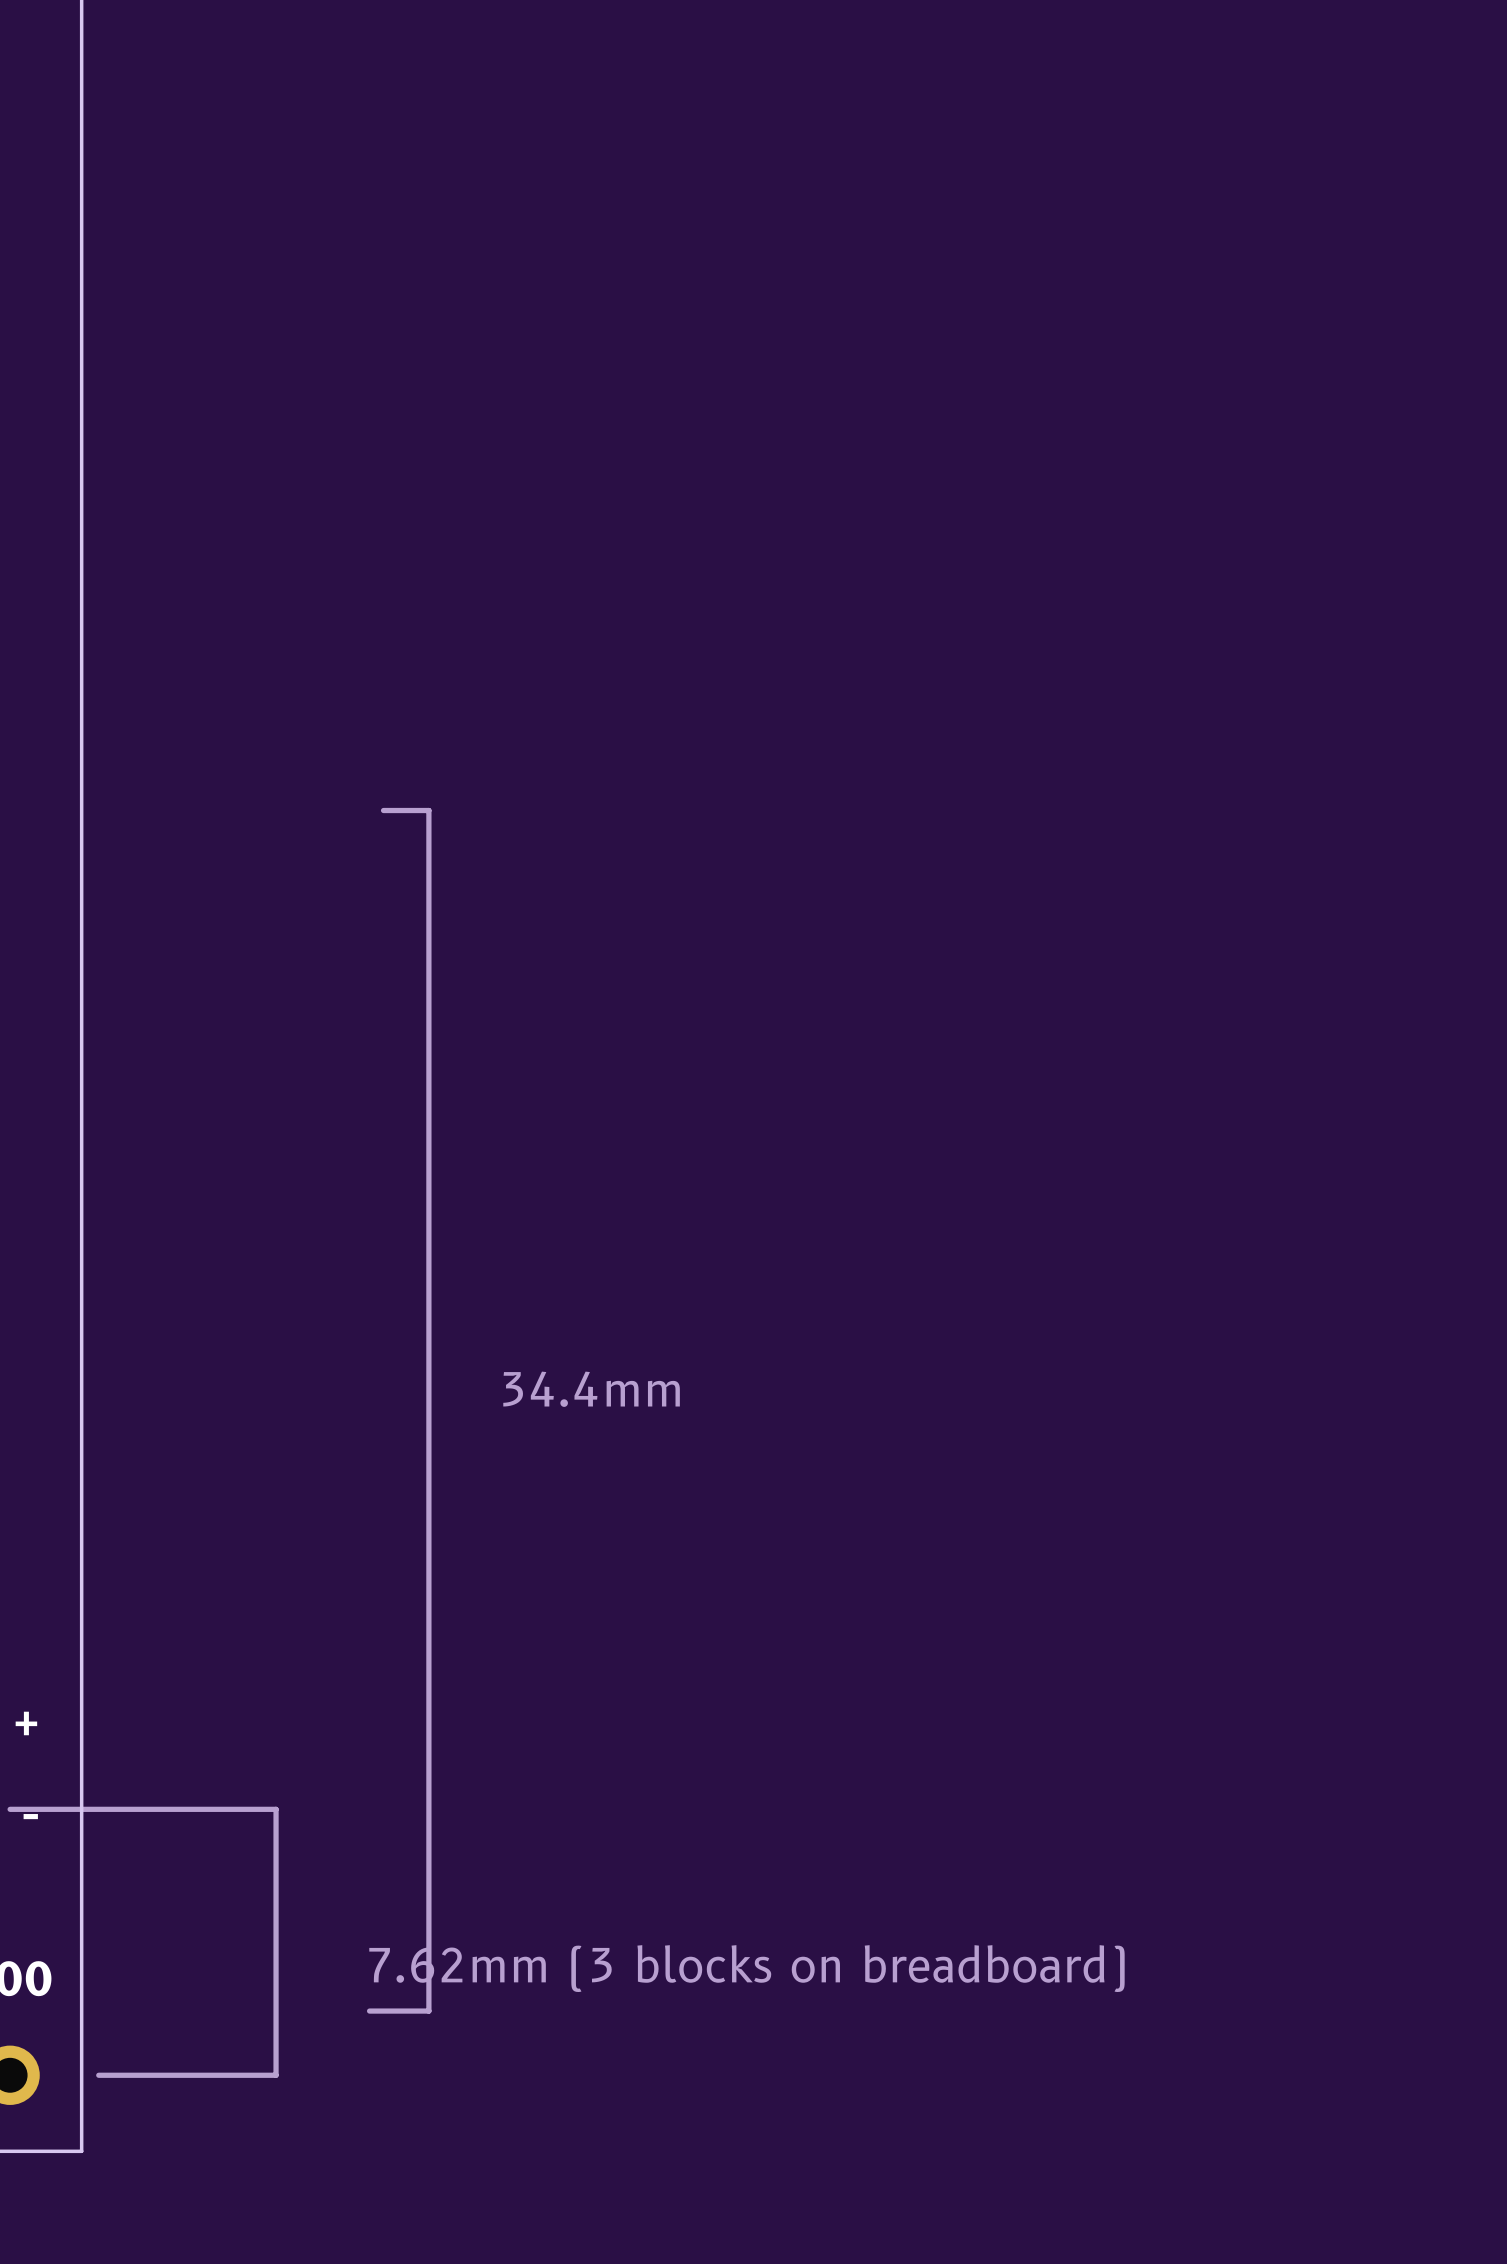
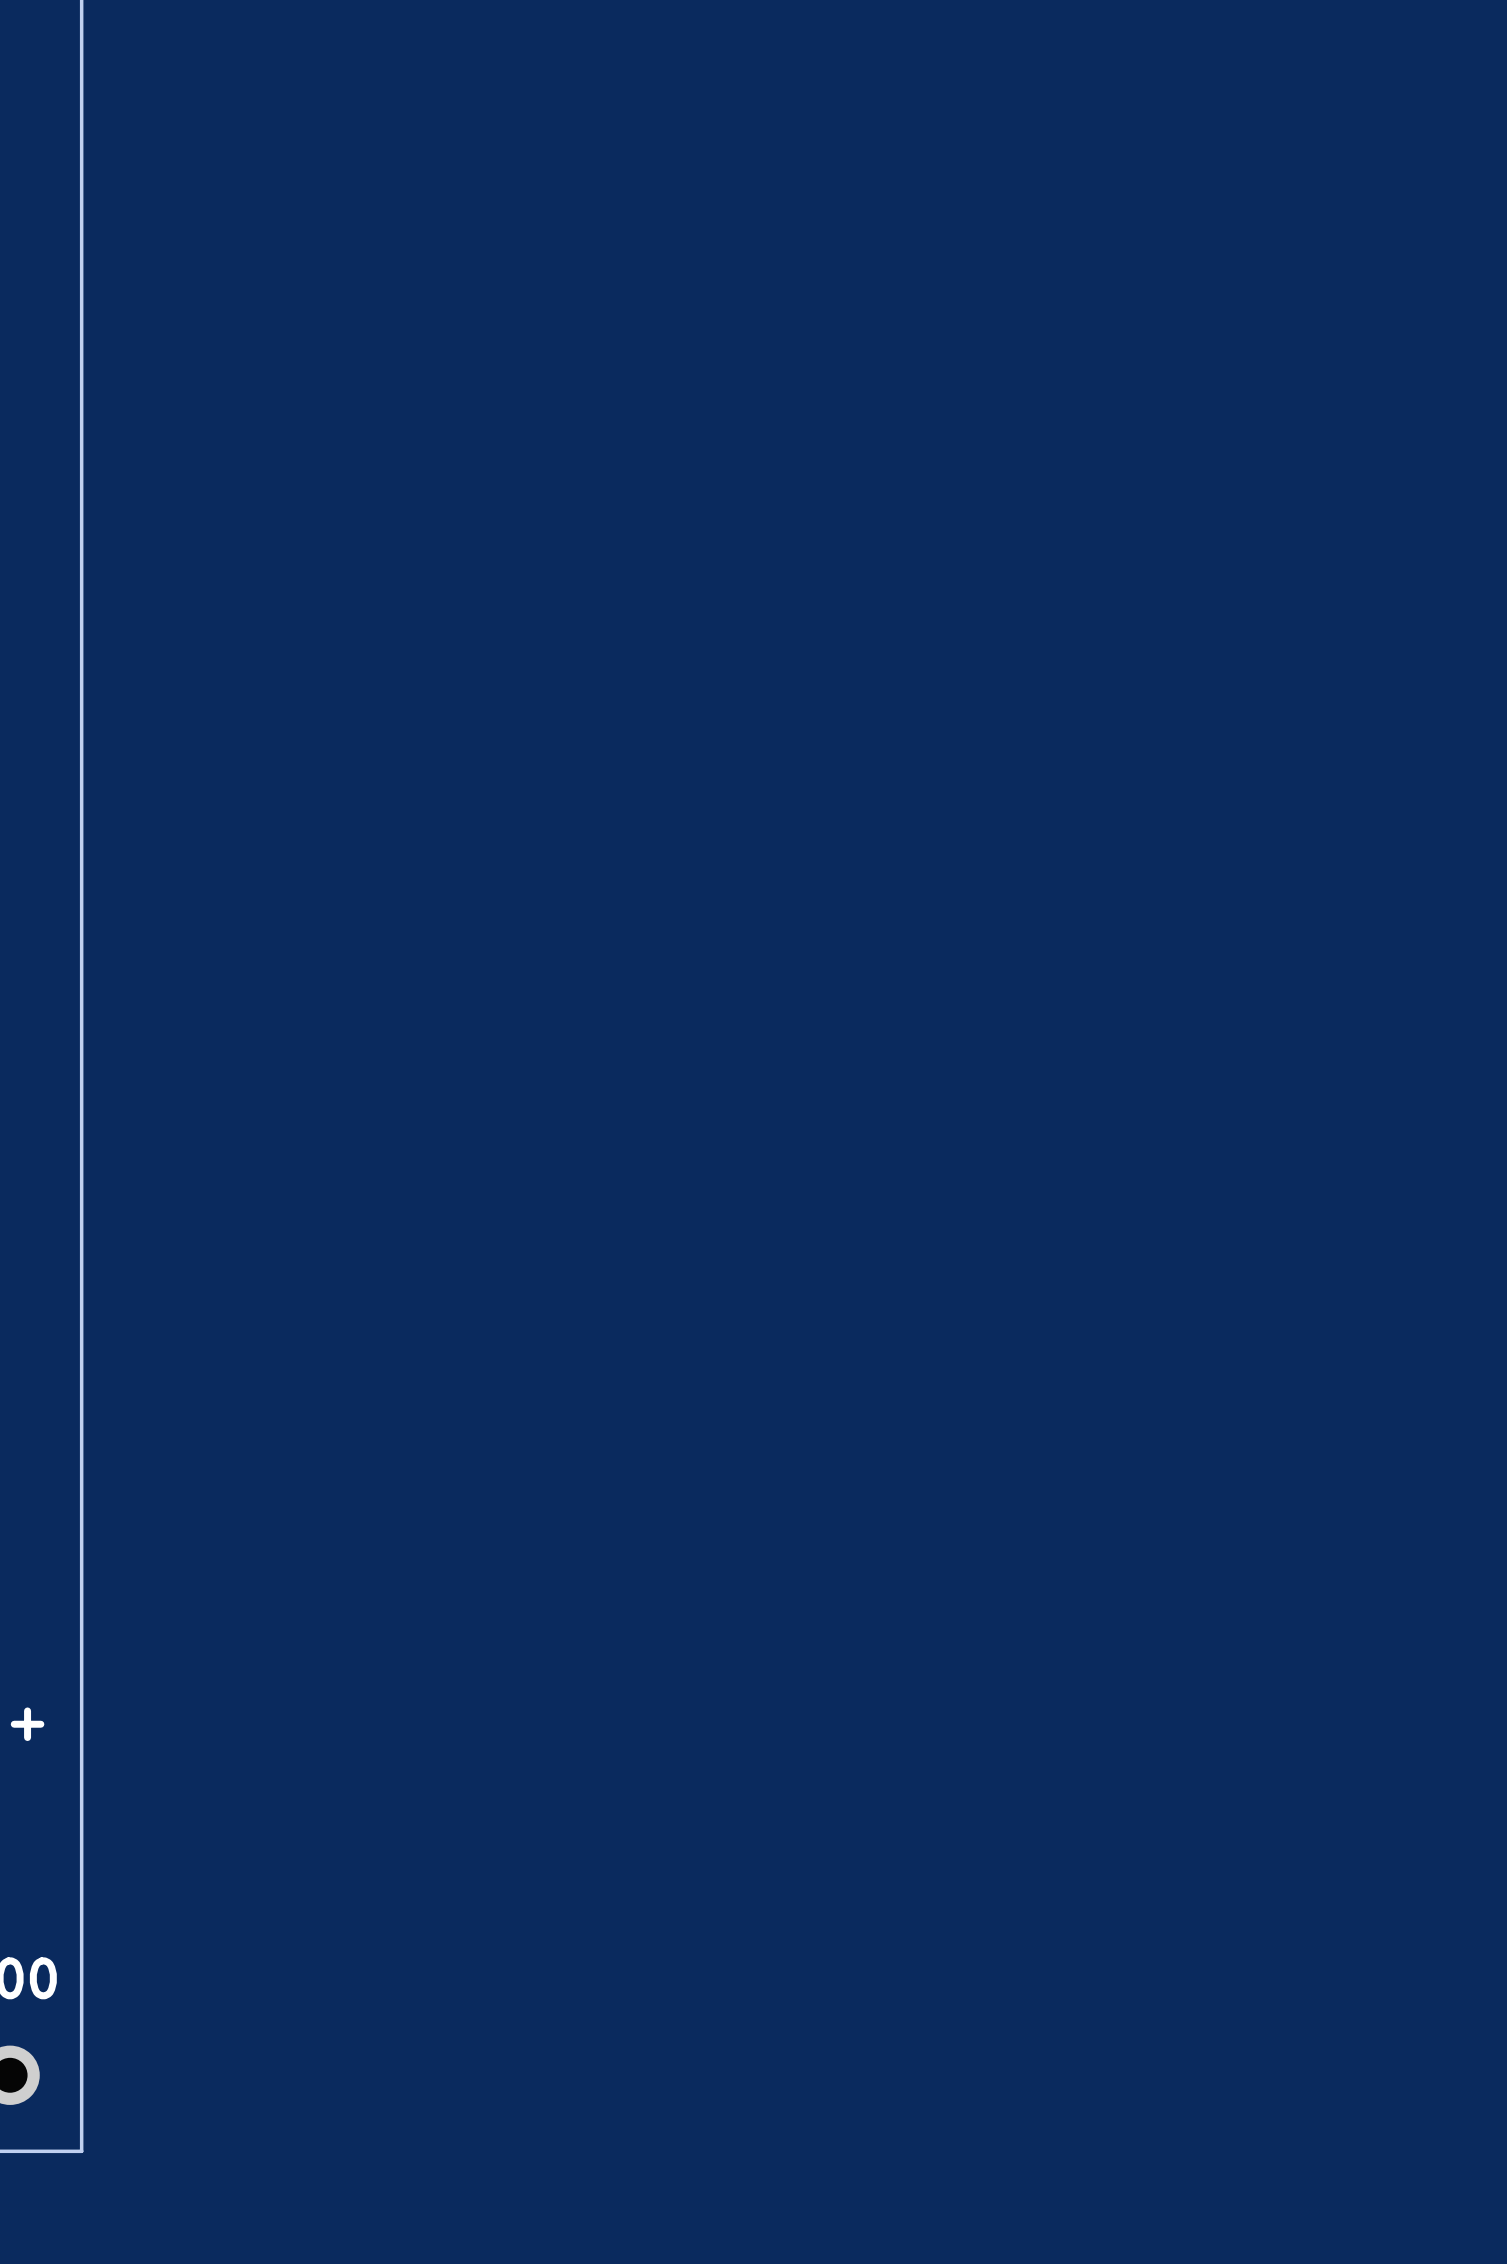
line: (383, 810) (428, 810) (428, 2011) (369, 2011) -> none
text: 34.4mm (591, 1389) -> none
line: (10, 1809) (276, 1809) (276, 2075) (98, 2075) -> none
text: - (30, 1816) -> none
text: 7.62mm (3 blocks on breadboard) (746, 1968) -> none

